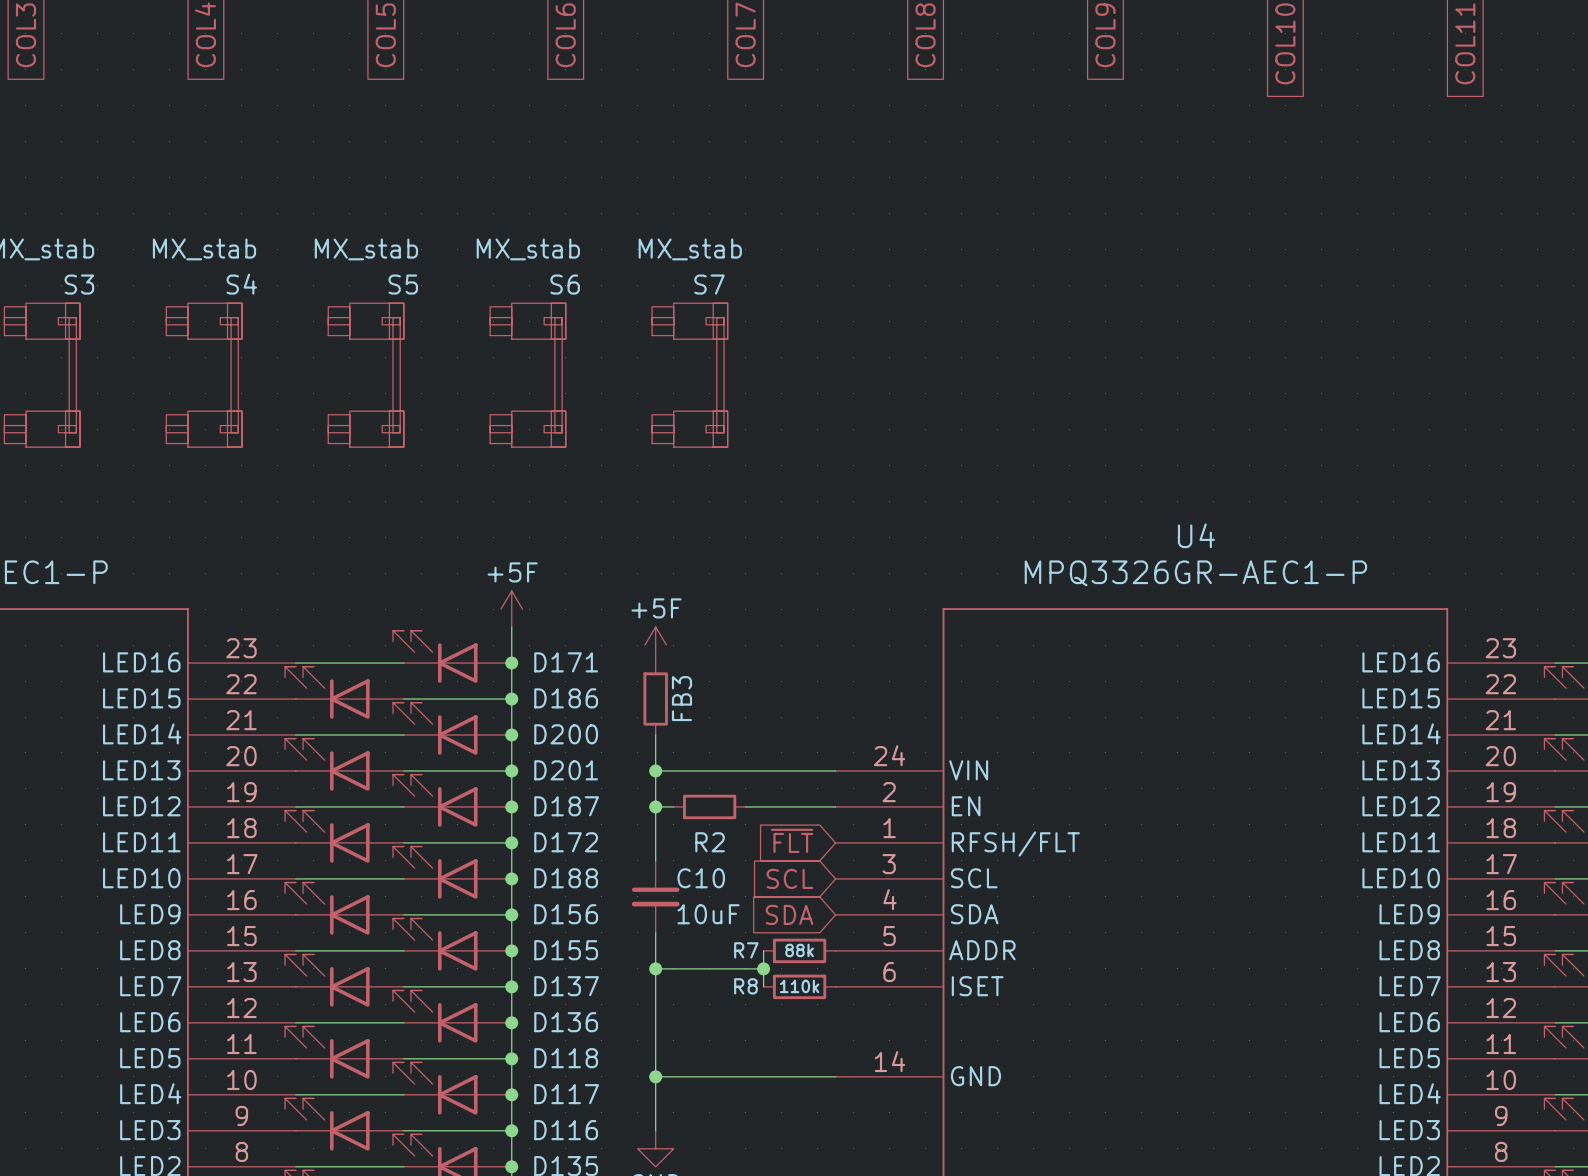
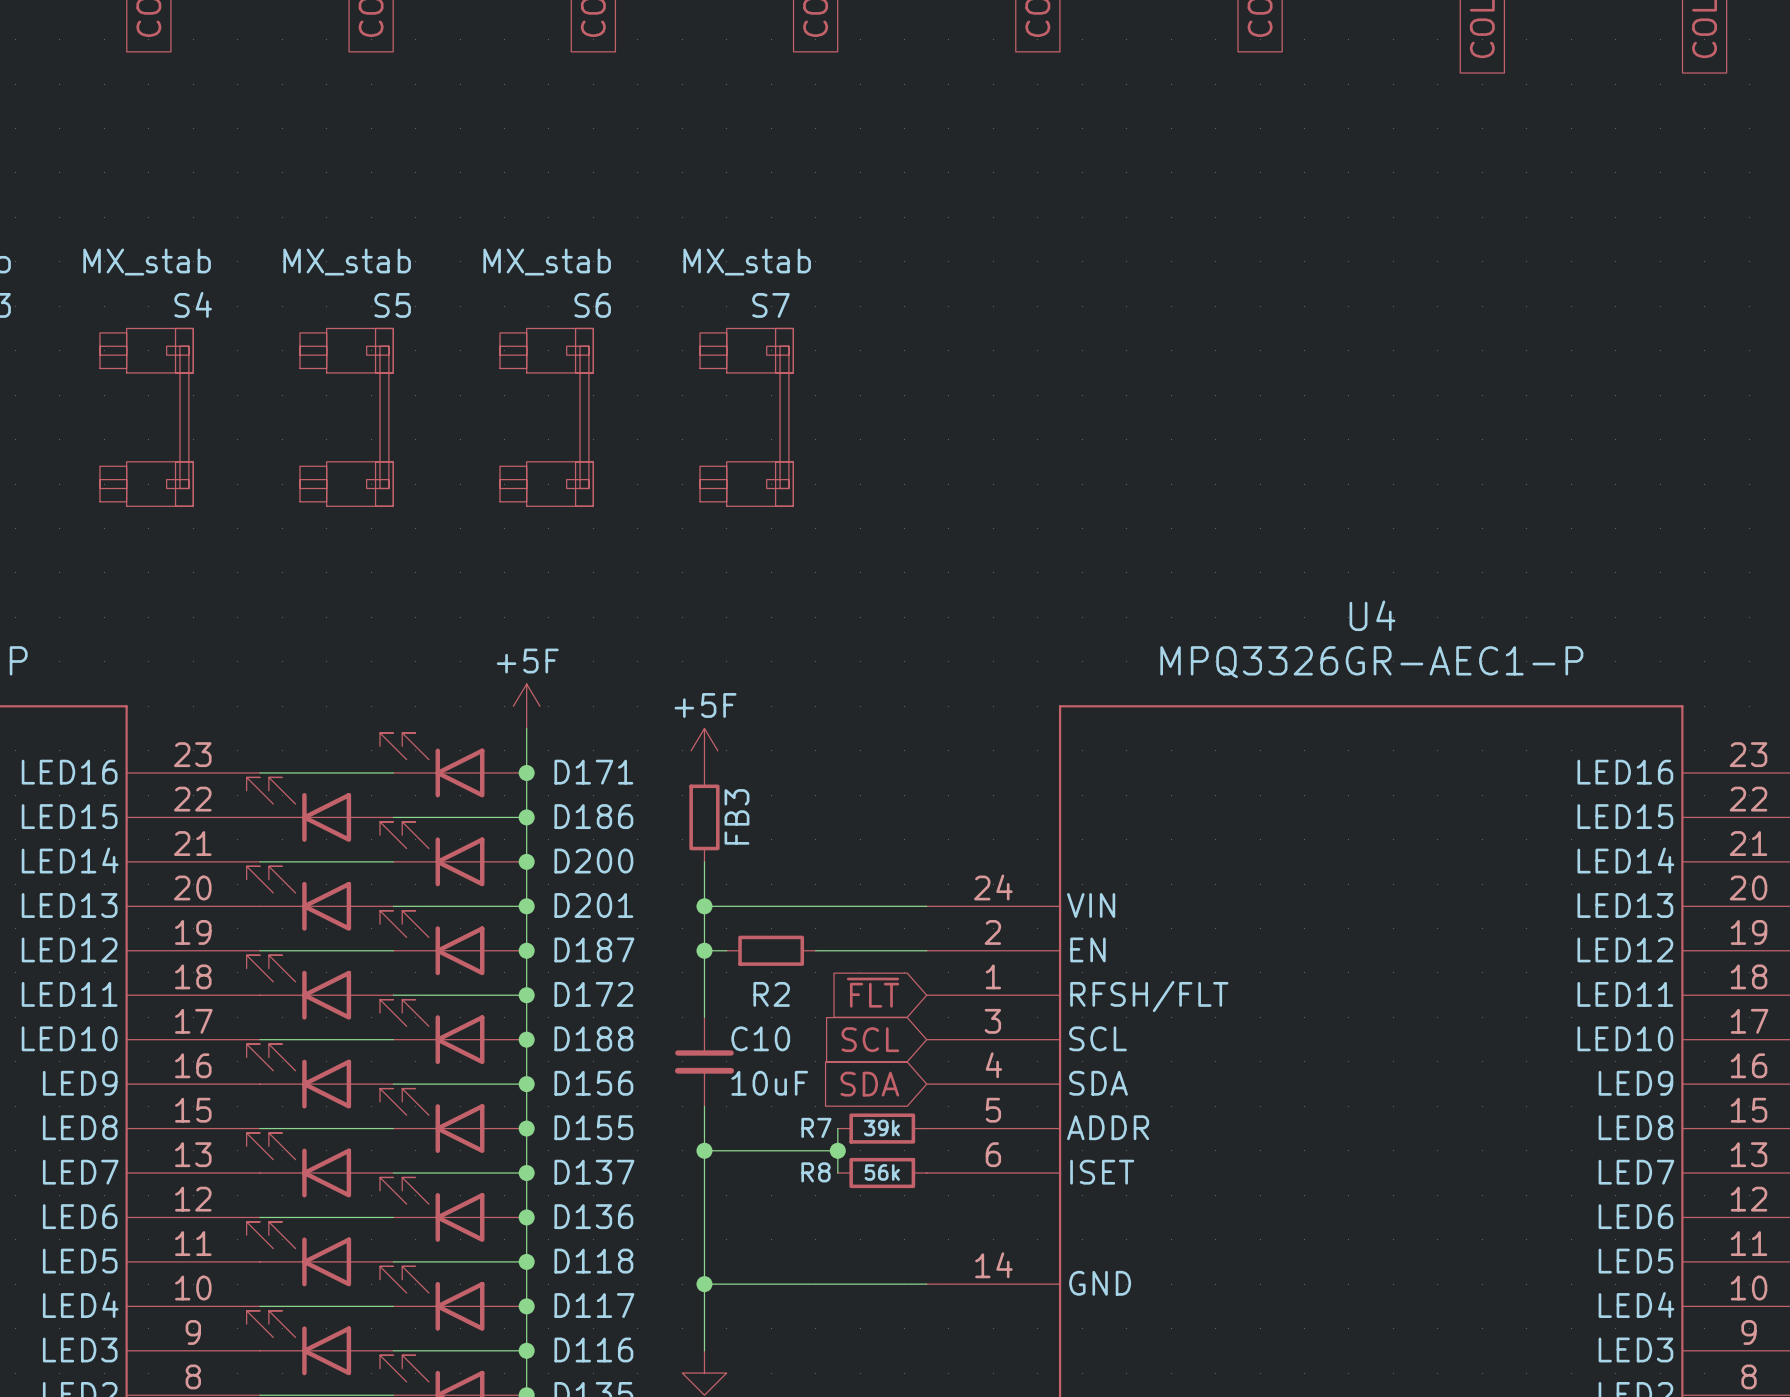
R7 value: 88k (799, 950) -> 39k (881, 1128)
R8 value: 110k (799, 986) -> 56k (882, 1172)

